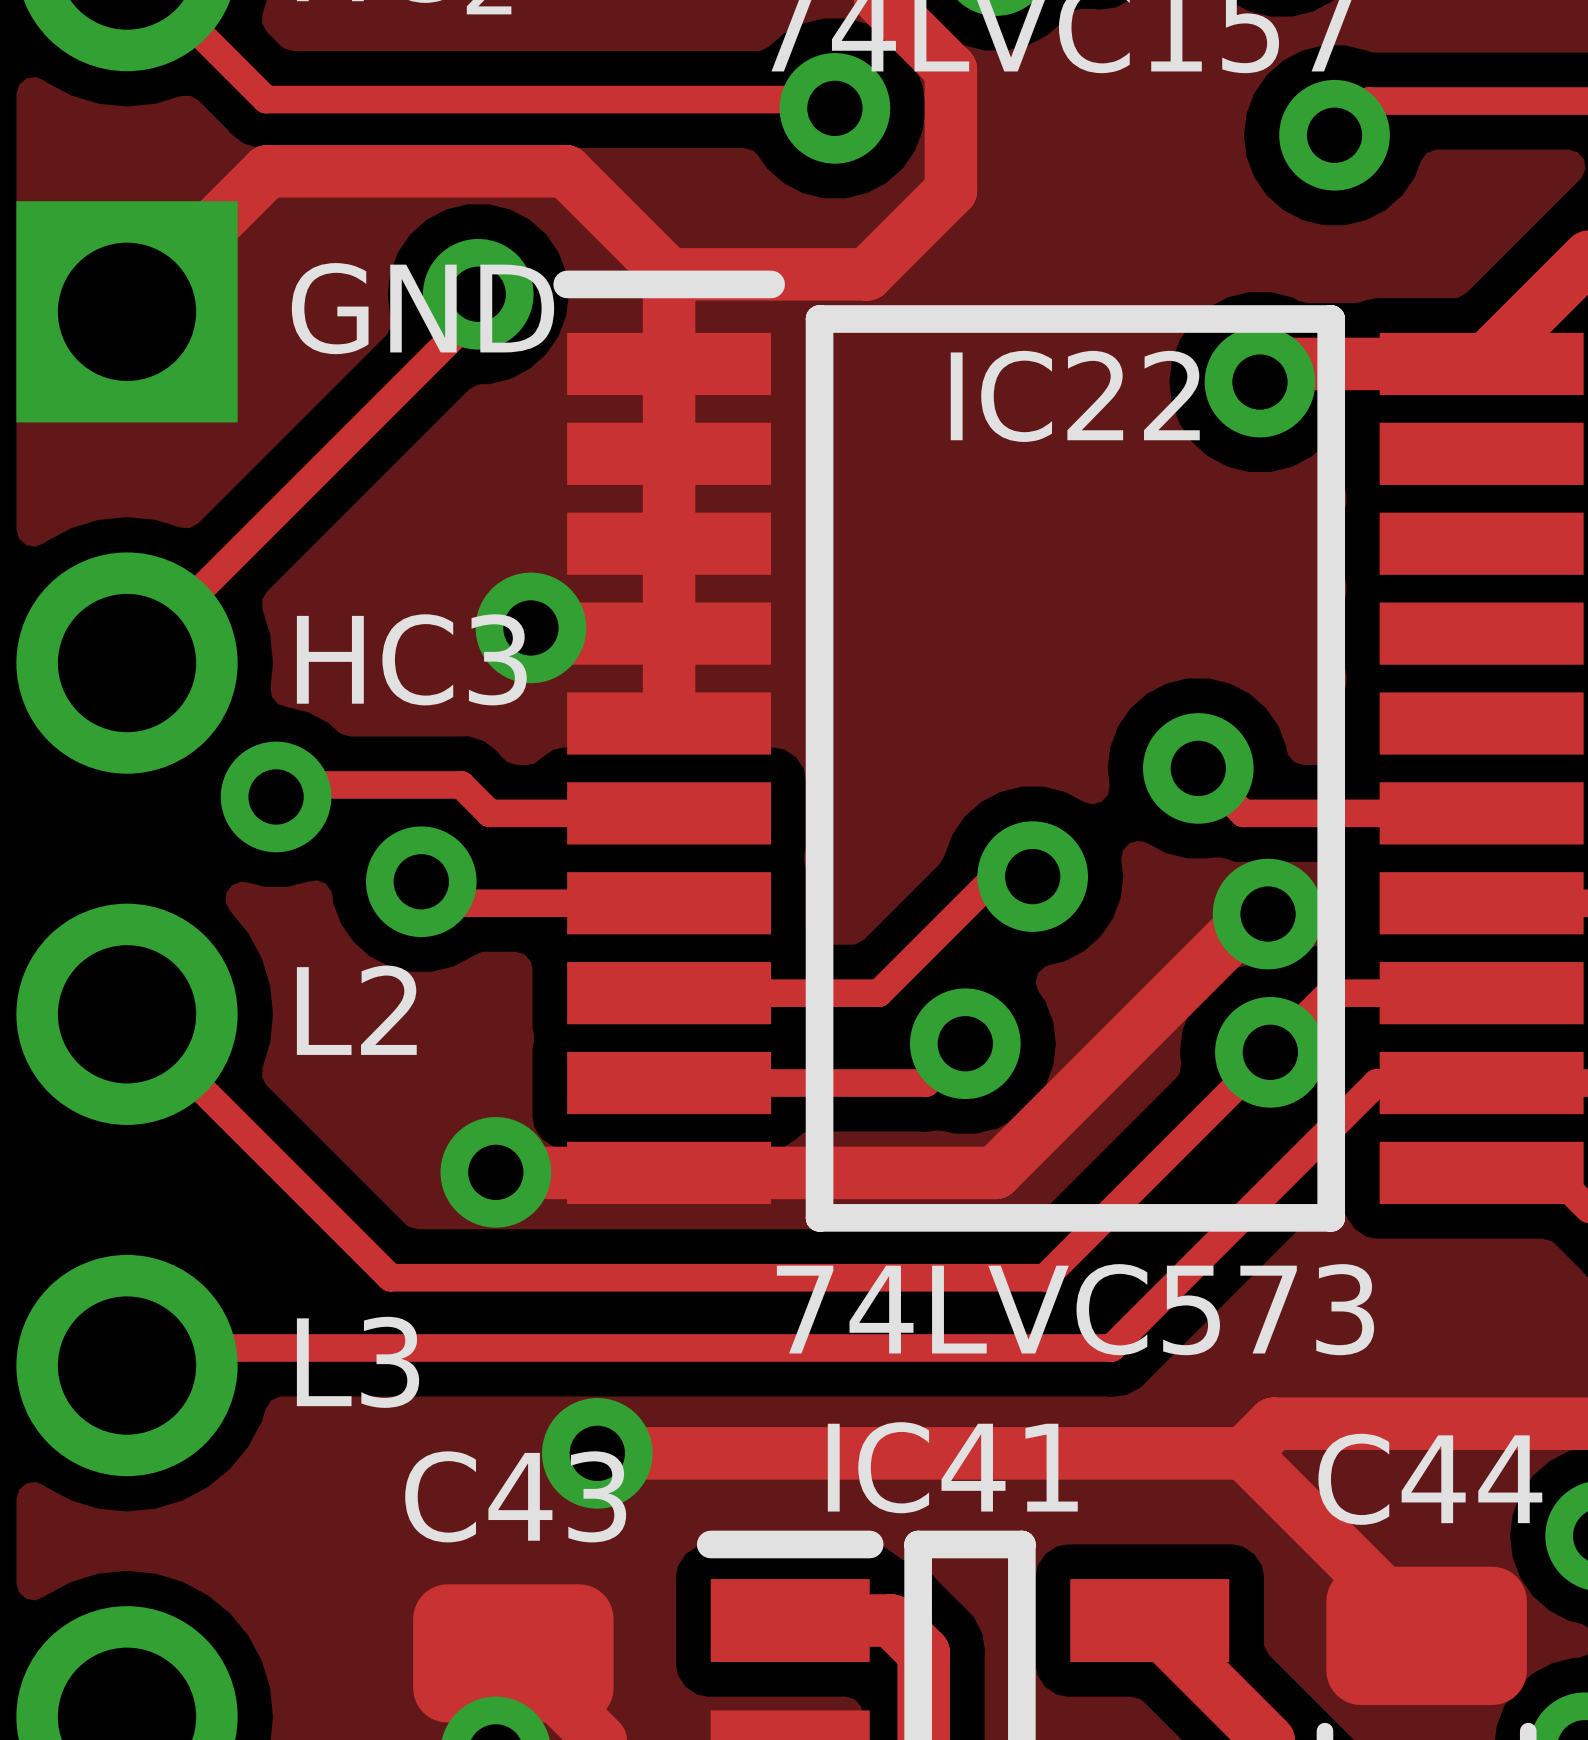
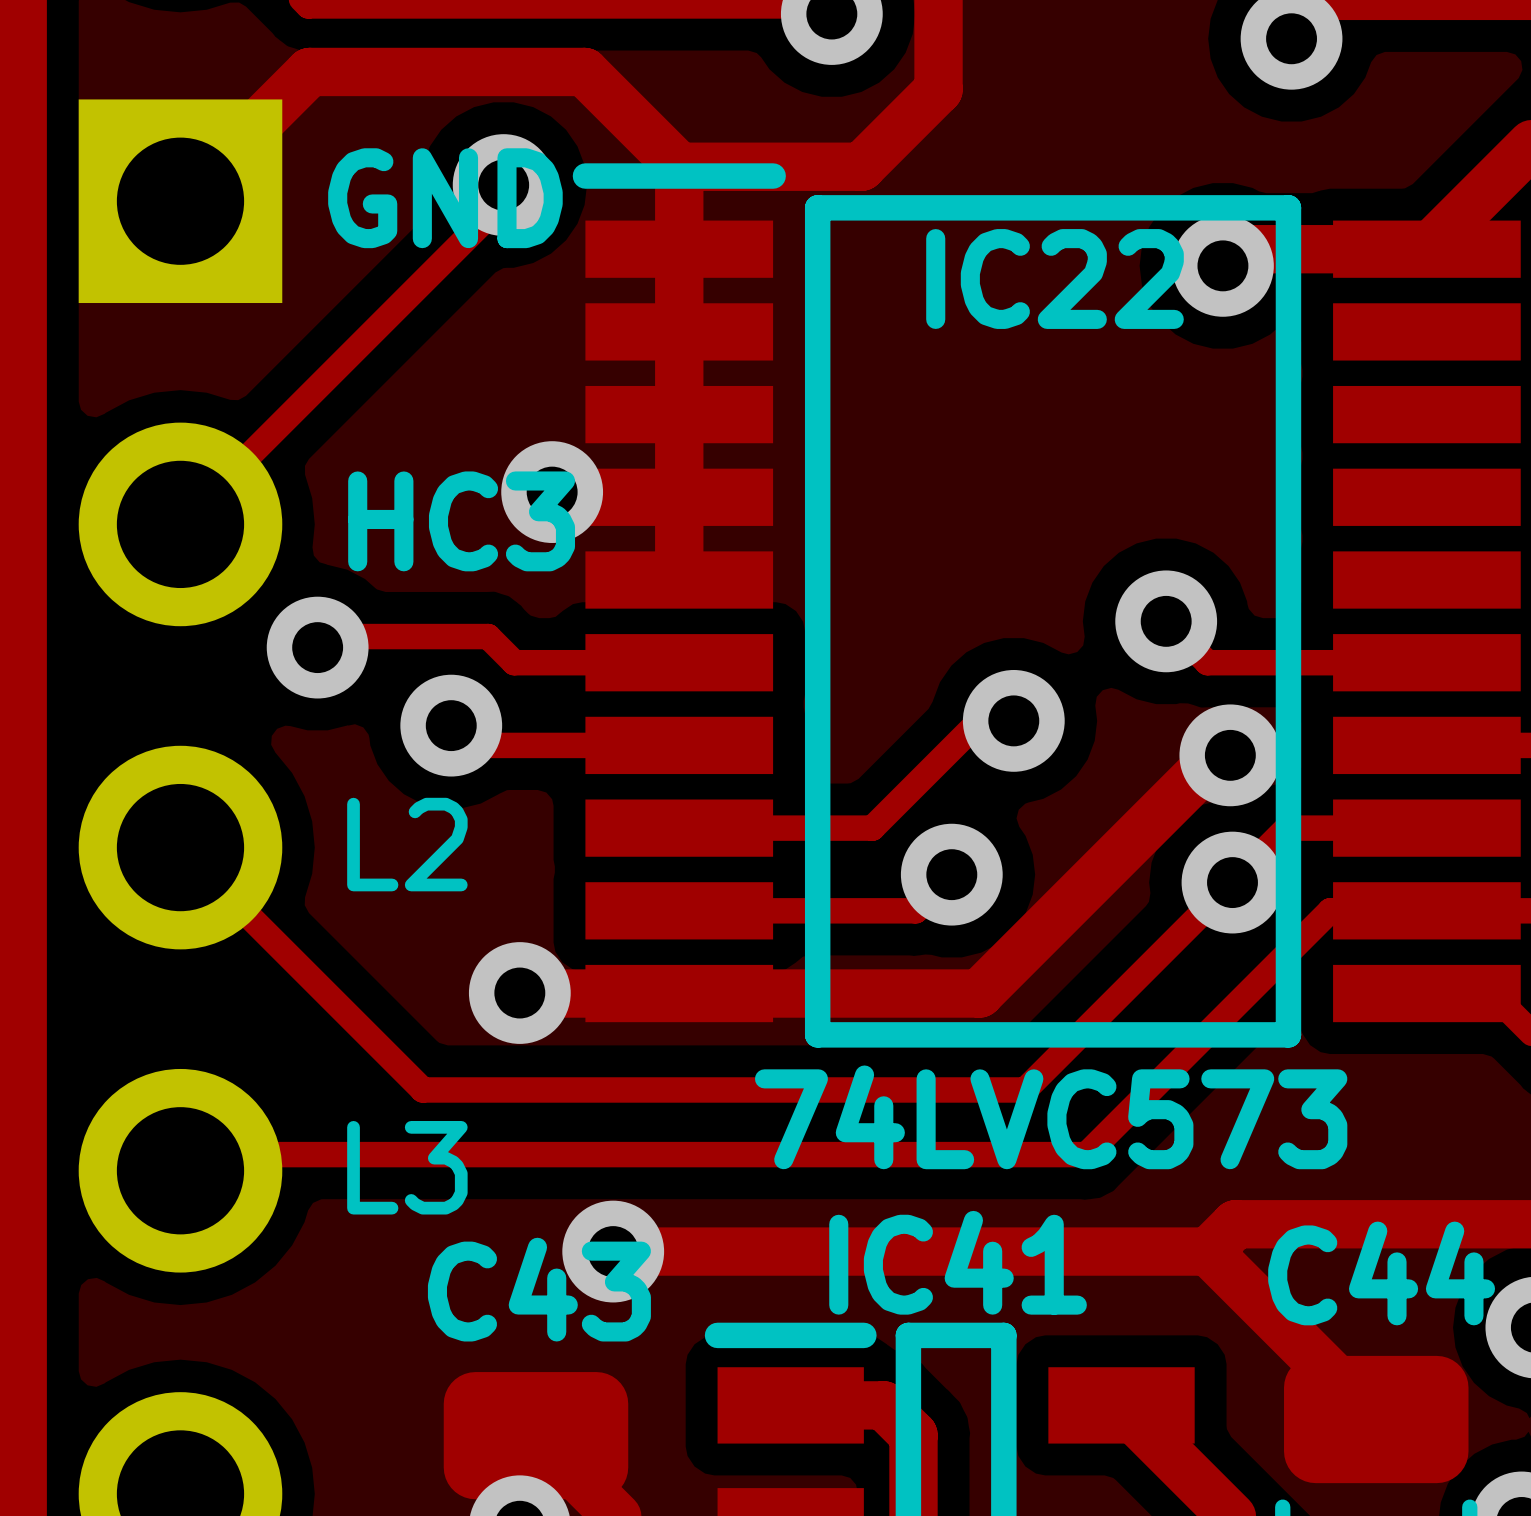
text position: GND (422, 308) -> GND (445, 198)
IC41 name position: IC41 (952, 1467) -> IC41 (958, 1262)

